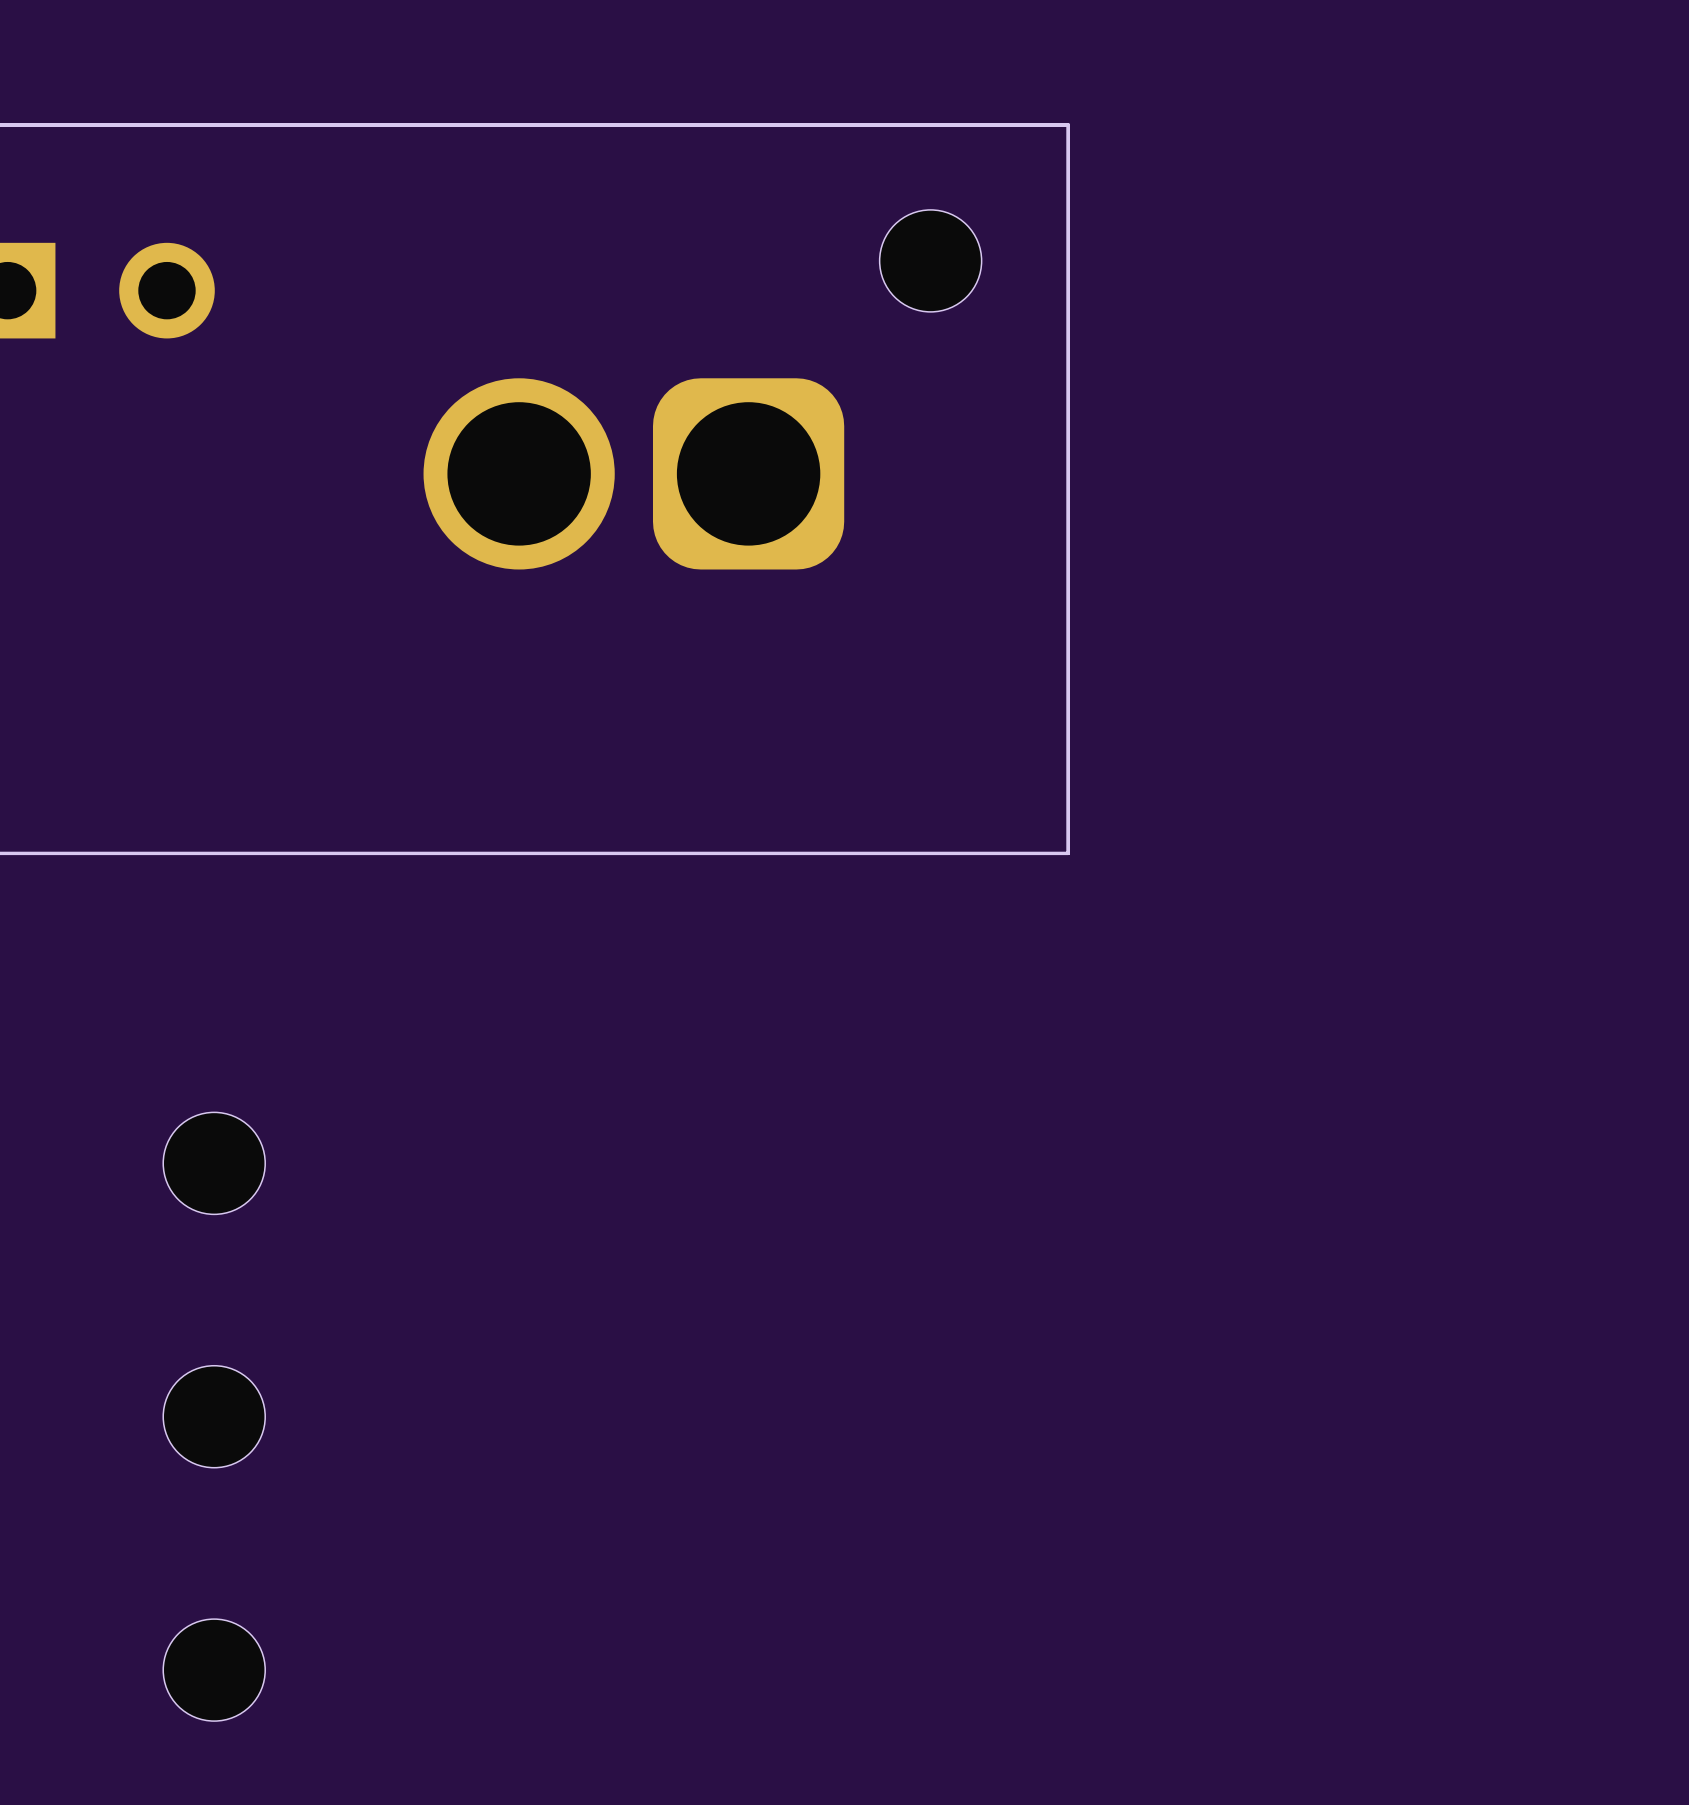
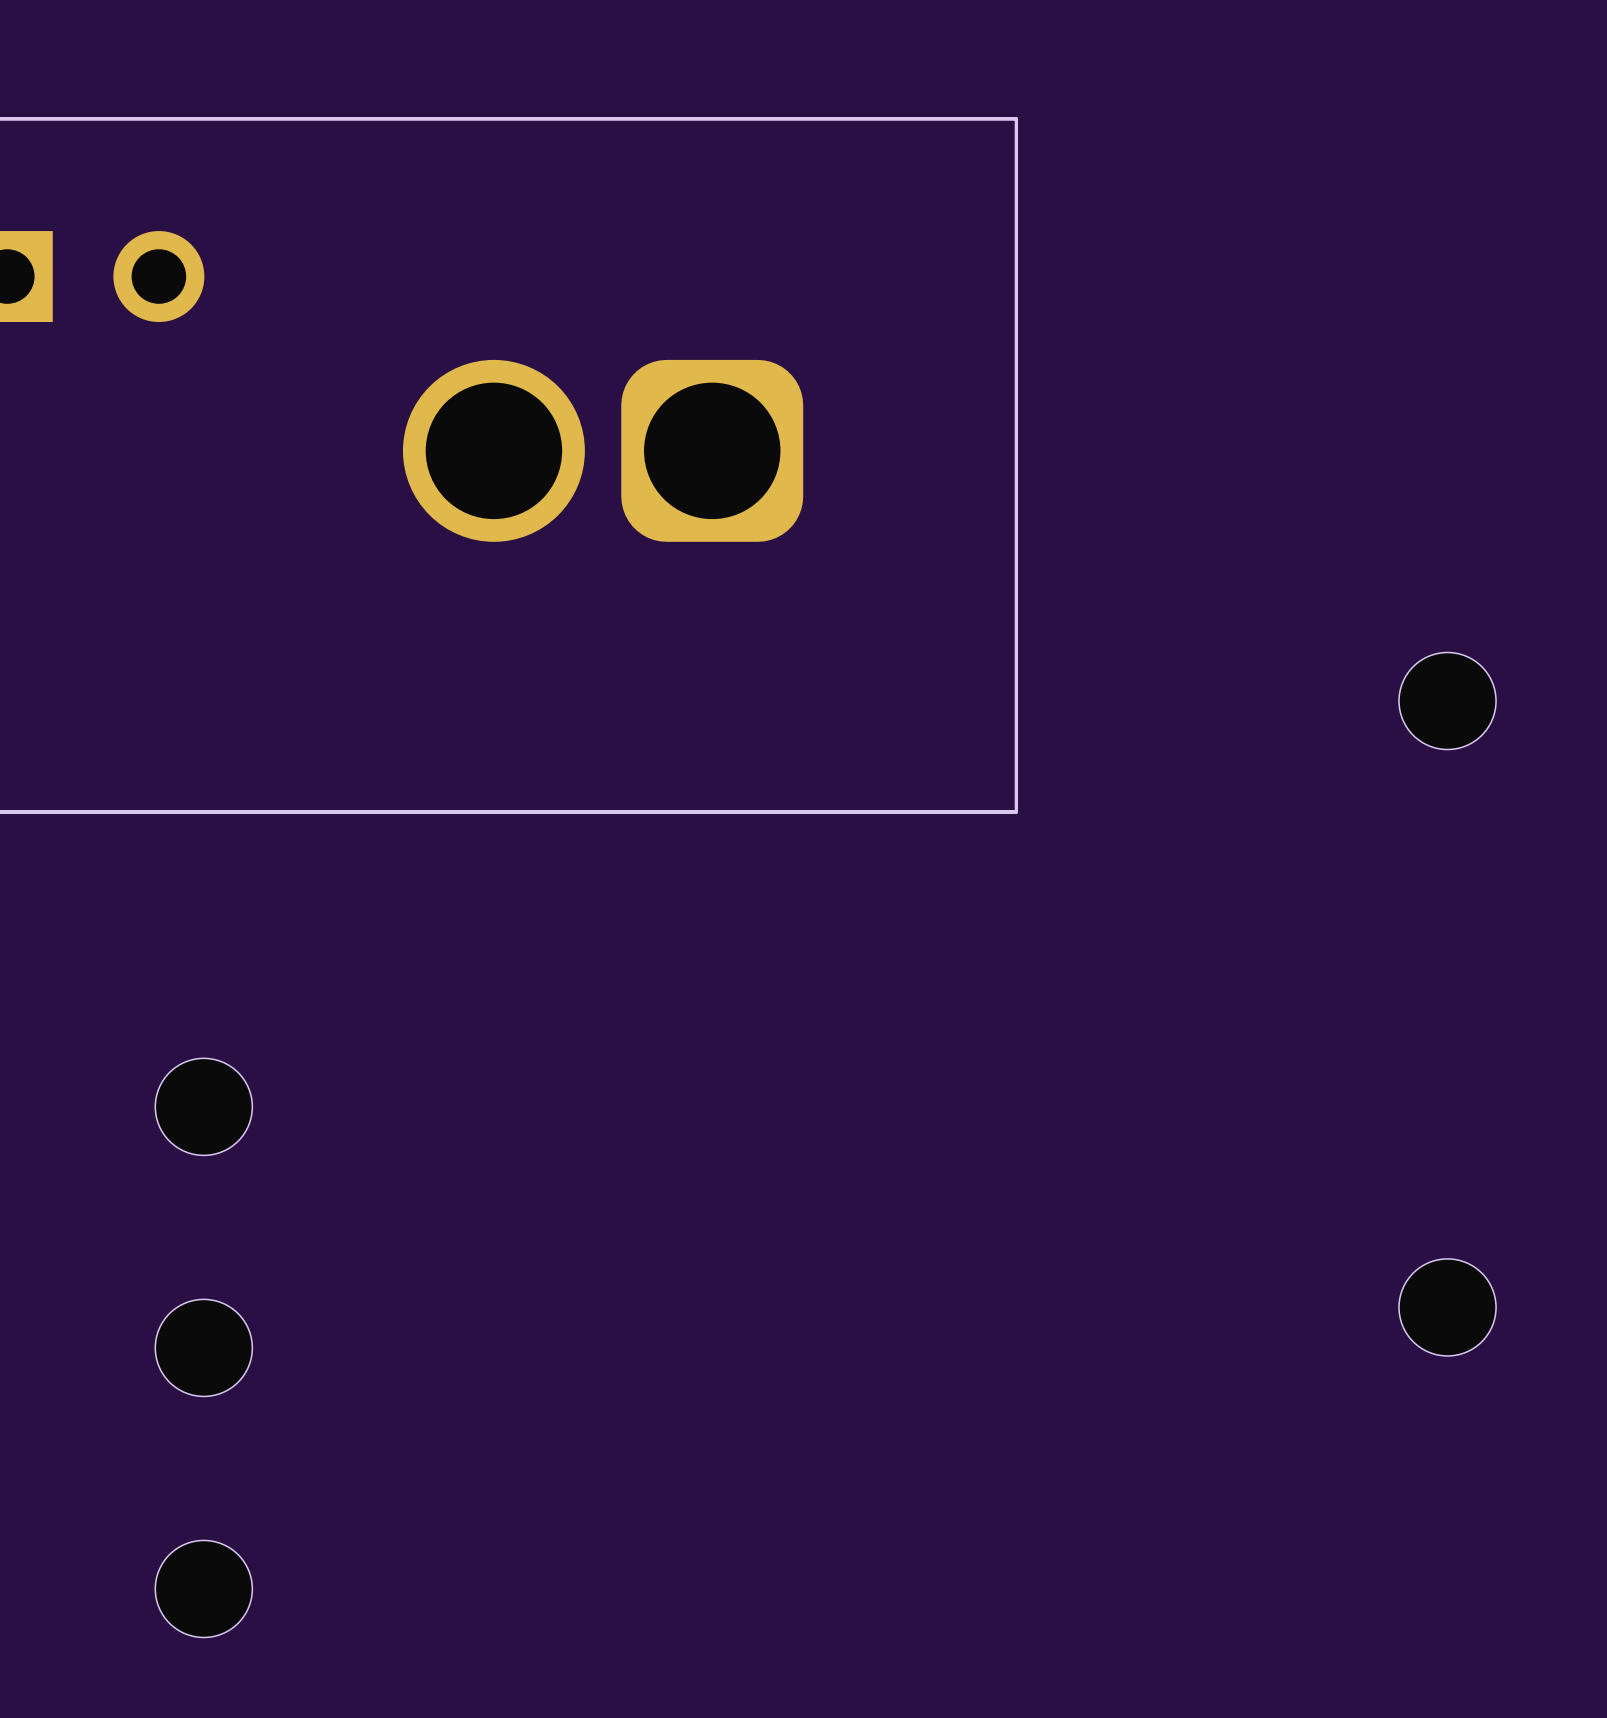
part: (930, 260) -> none
part: none -> (1447, 701)
part: none -> (1447, 1307)

